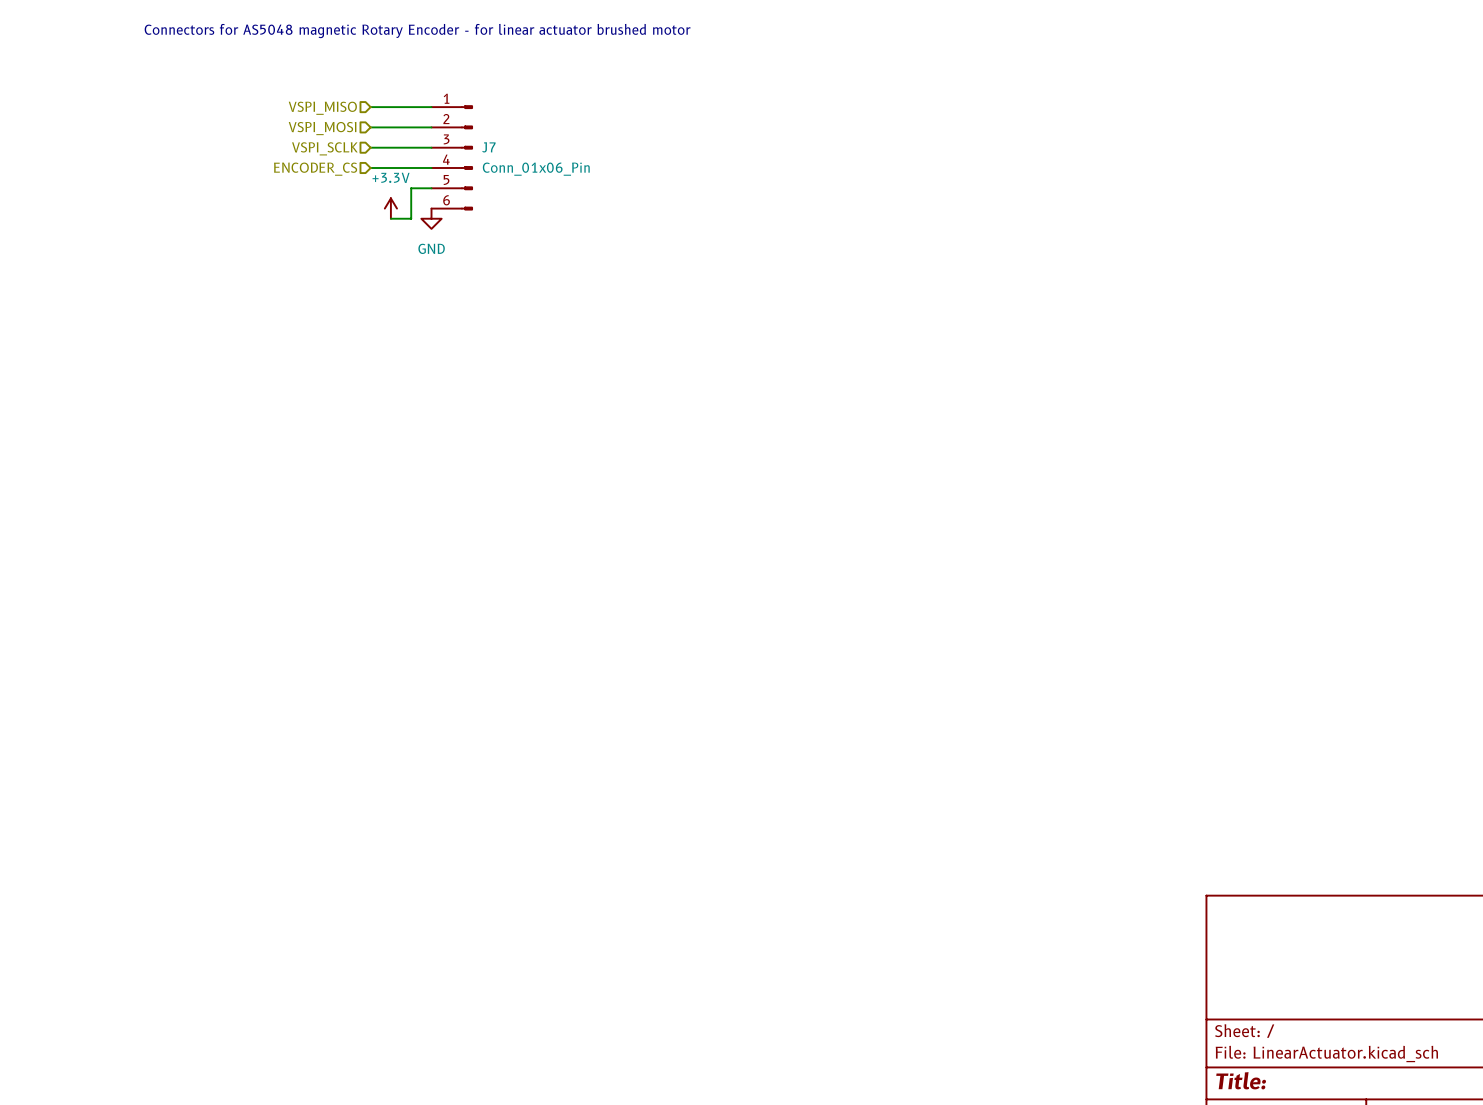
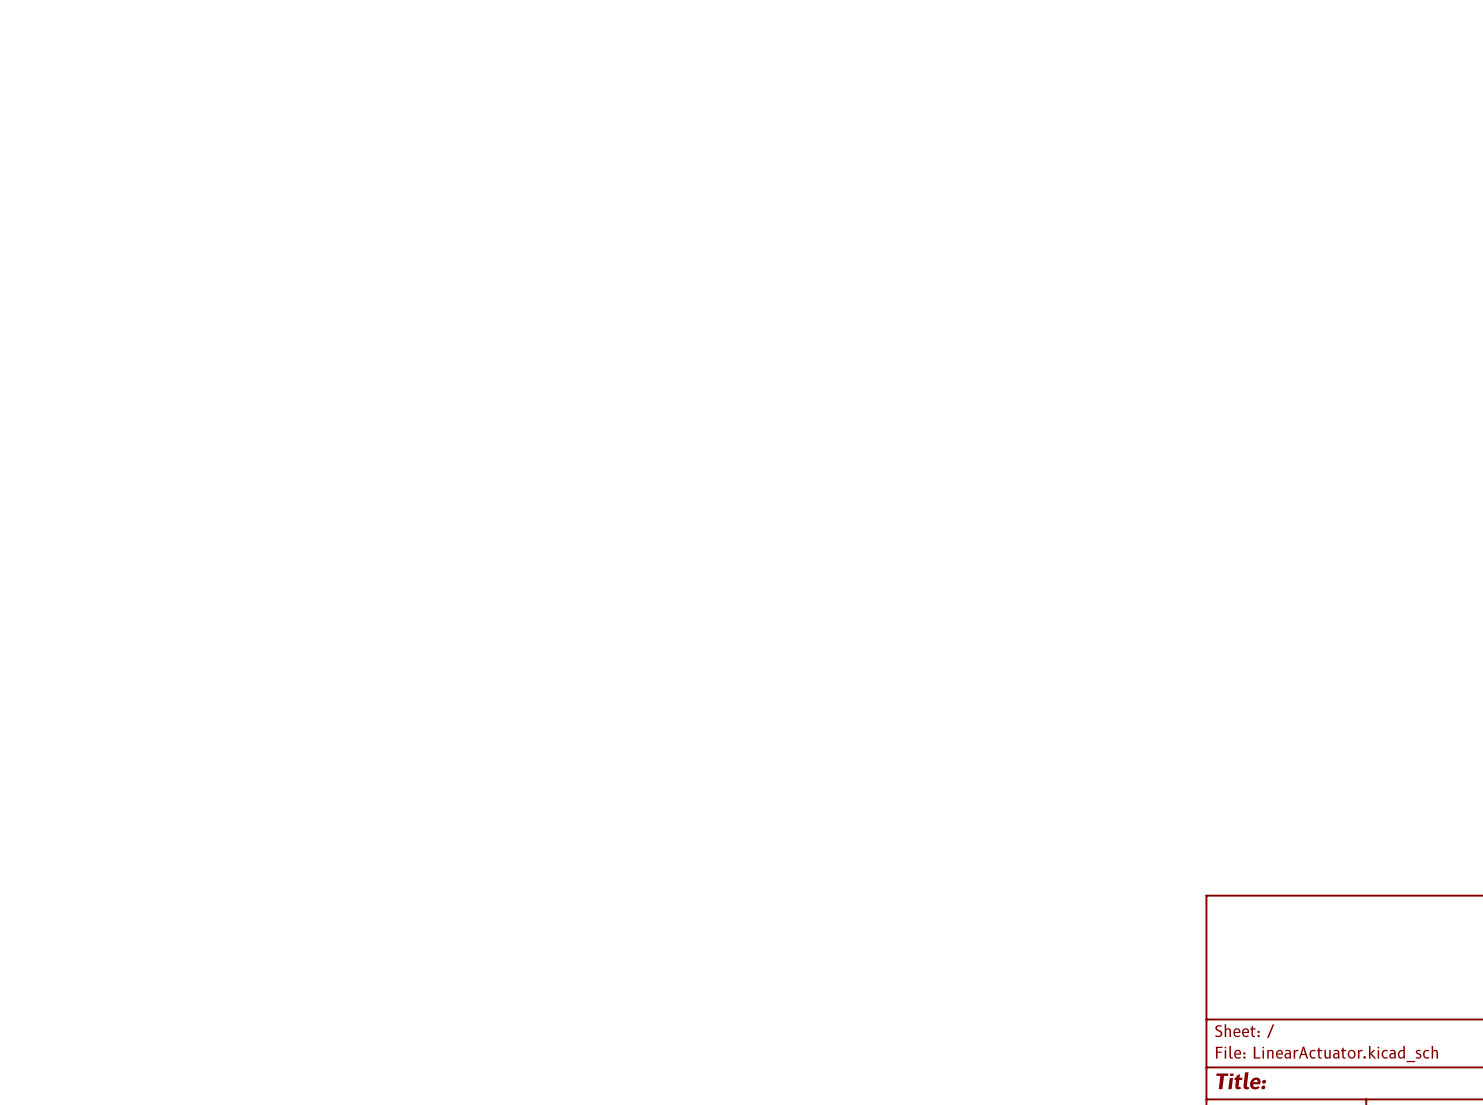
text: Connectors for AS5048 magnetic Rotary Encoder - for linear actuator brushed motor (417, 31) -> none
wire: (370, 107) (431, 107) -> none
hierarchical label: VSPI_MISO (322, 108) -> none
wire: (370, 127) (431, 127) -> none
hierarchical label: VSPI_MOSI (322, 128) -> none
wire: (370, 147) (431, 147) -> none
hierarchical label: VSPI_SCLK (324, 148) -> none
J7: Conn_01x06_Pin (452, 157) -> none
wire: (370, 168) (431, 168) -> none
hierarchical label: ENCODER_CS (315, 169) -> none
wire: (431, 188) (411, 188) (411, 218) (390, 218) -> none
power symbol: +3.3V (390, 208) -> none
power symbol: GND (431, 218) -> none

